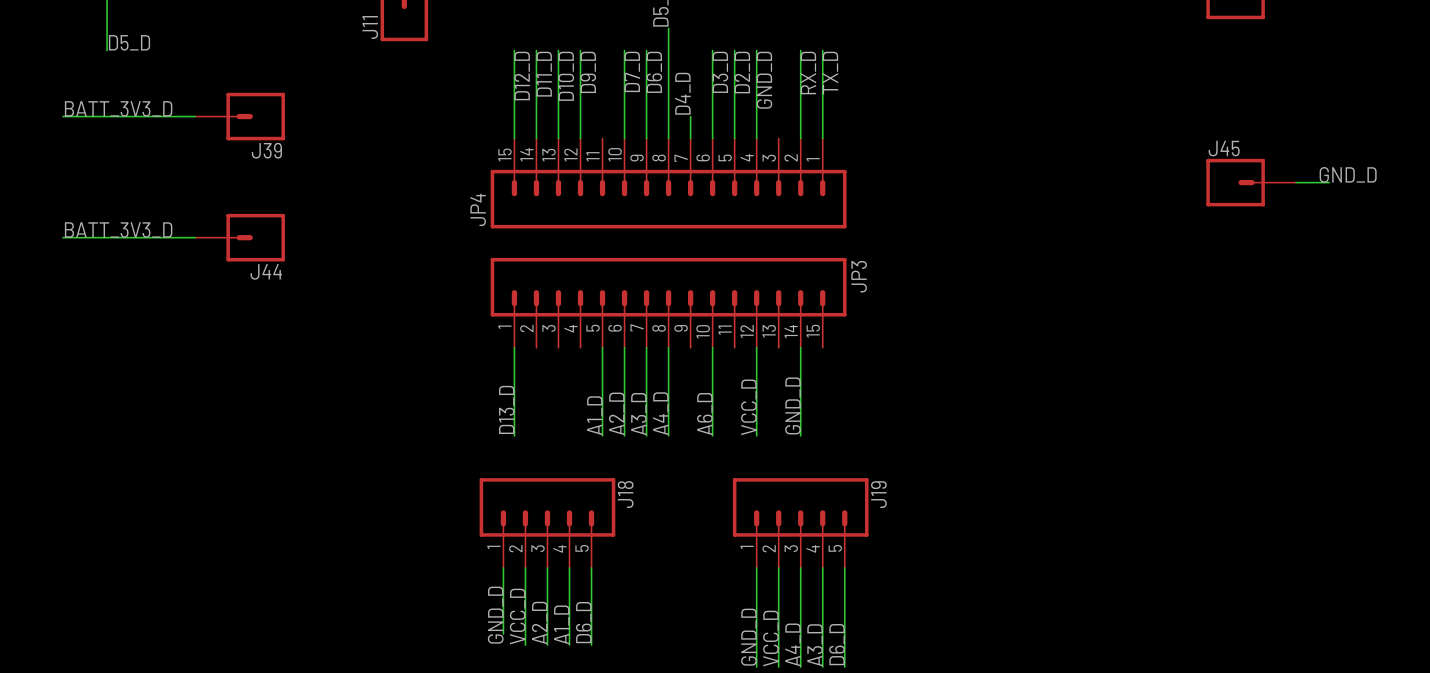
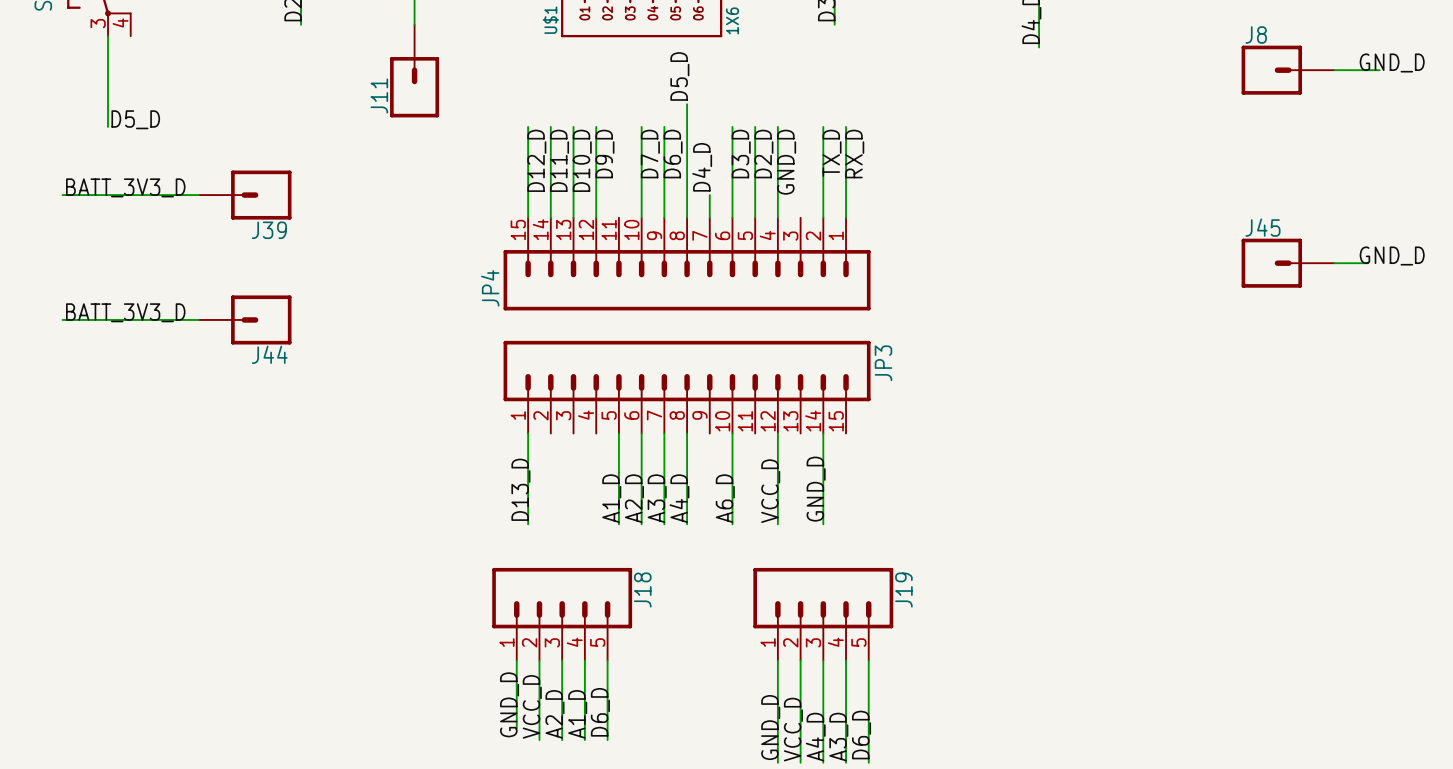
label: RX_D (808, 73) -> TX_D (832, 153)
label: TX_D (830, 73) -> RX_D (854, 154)

